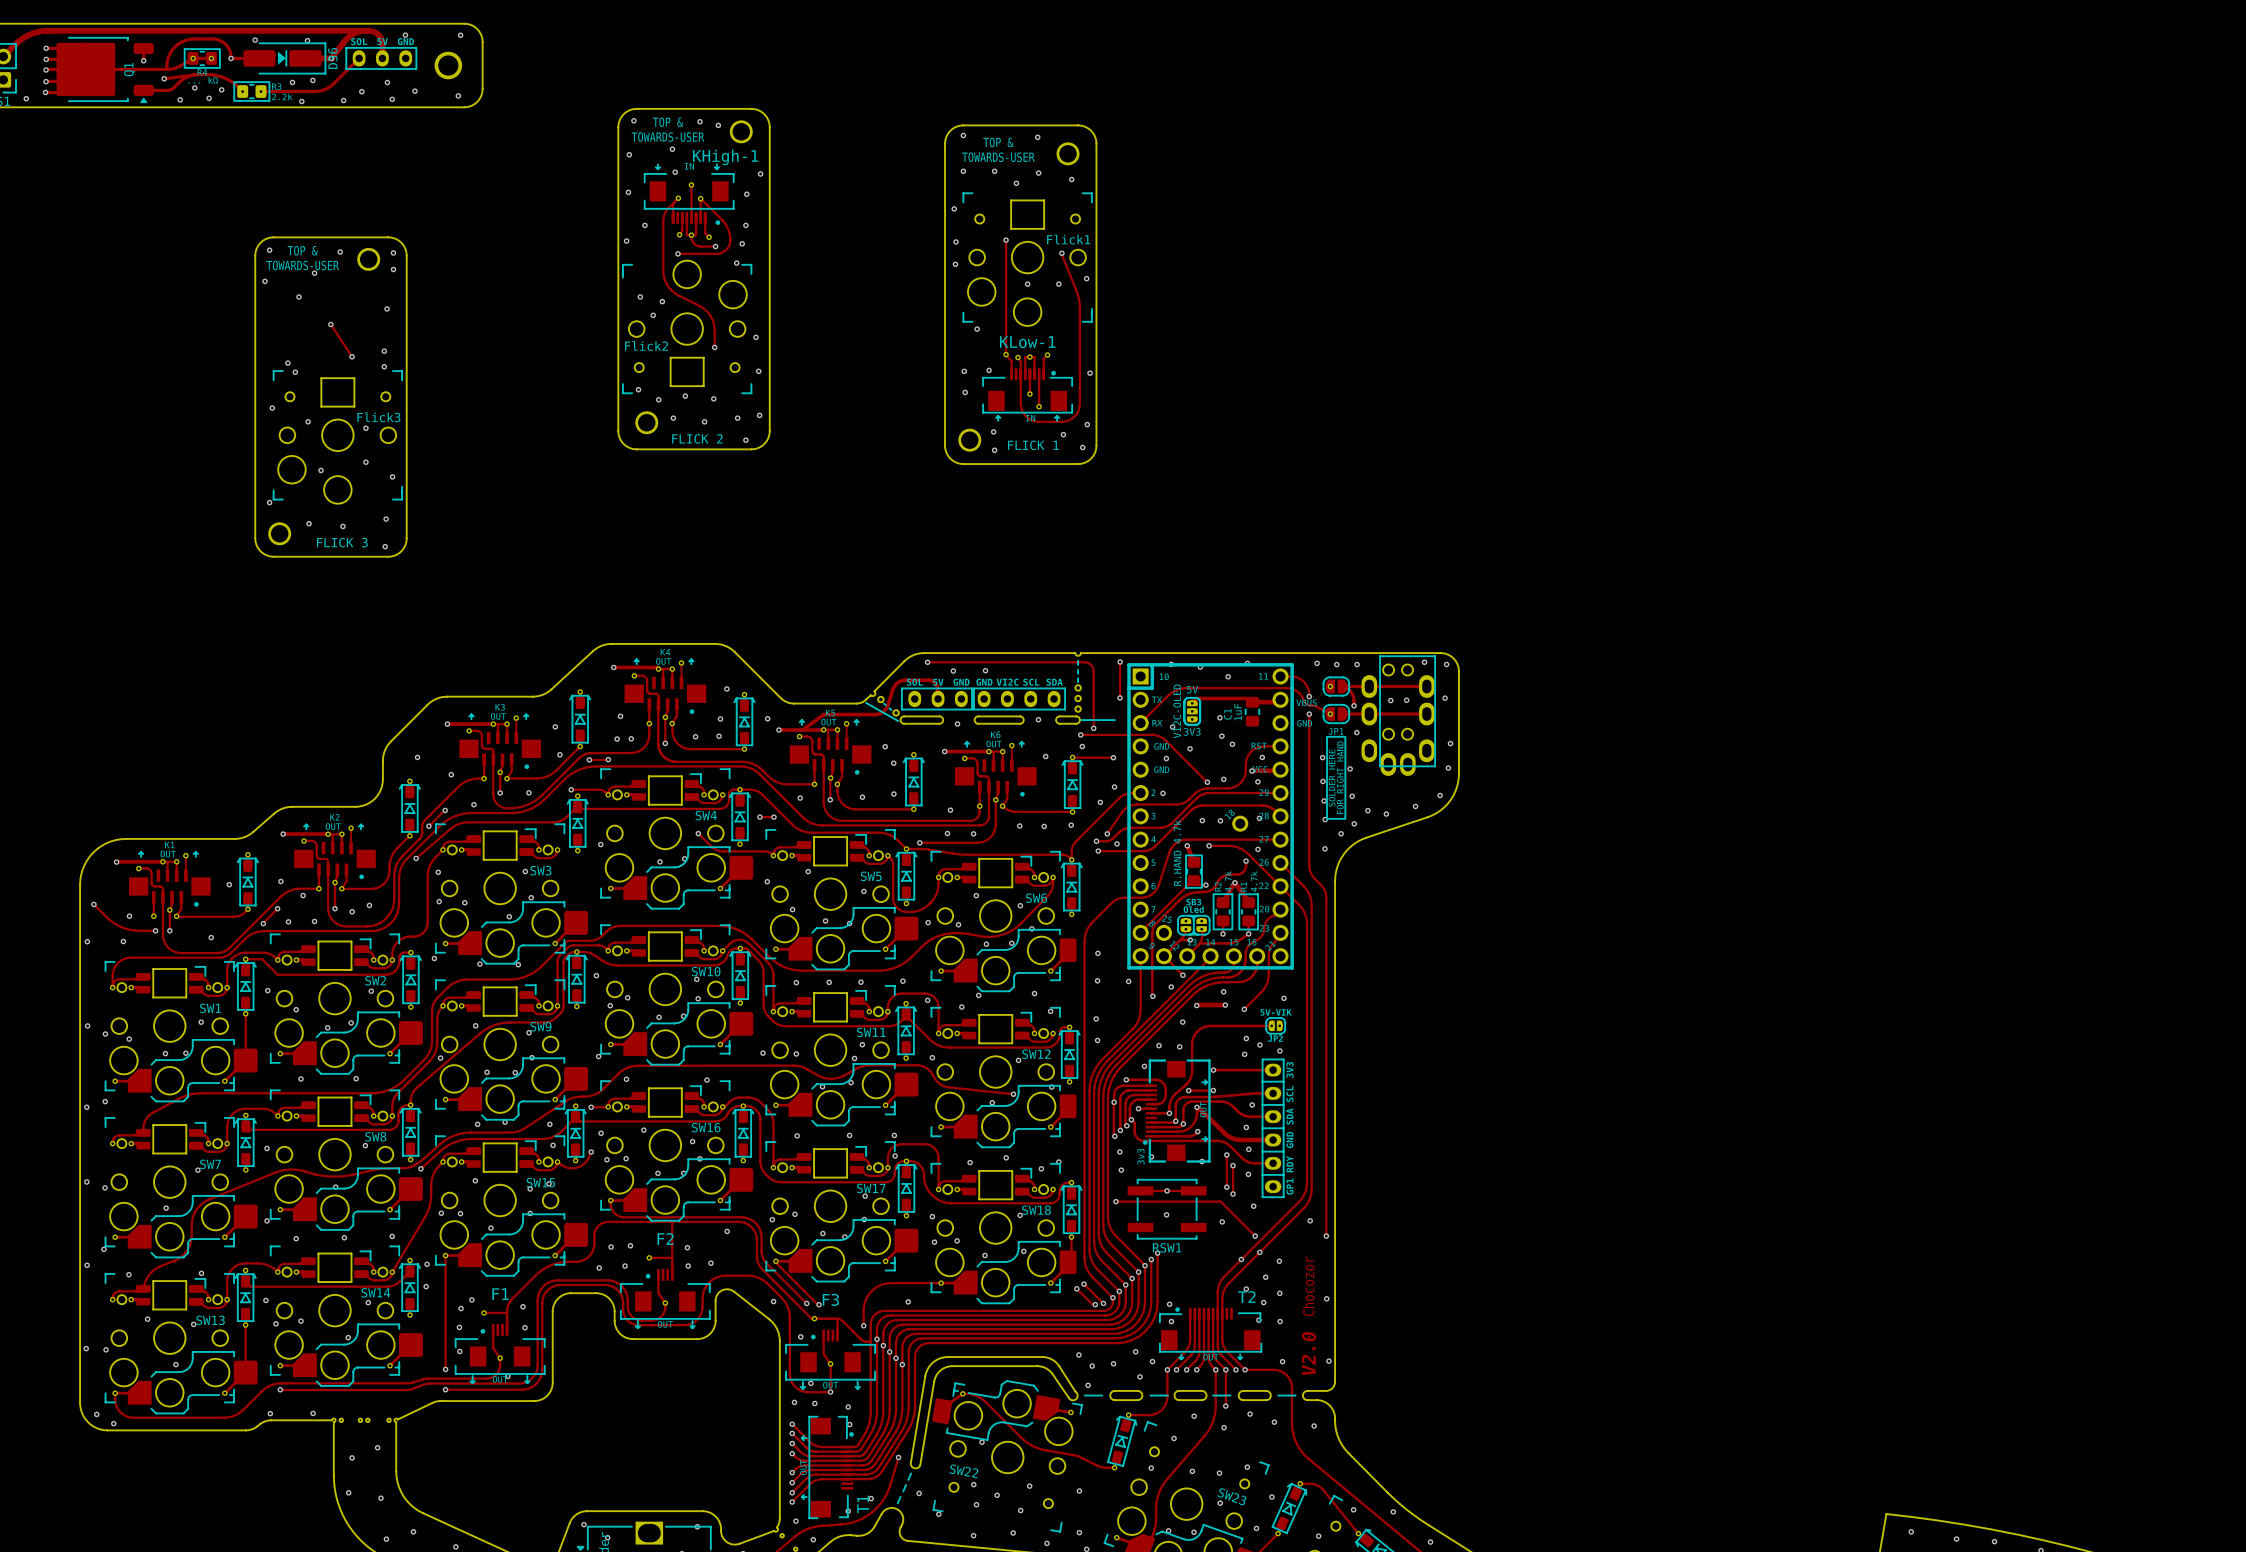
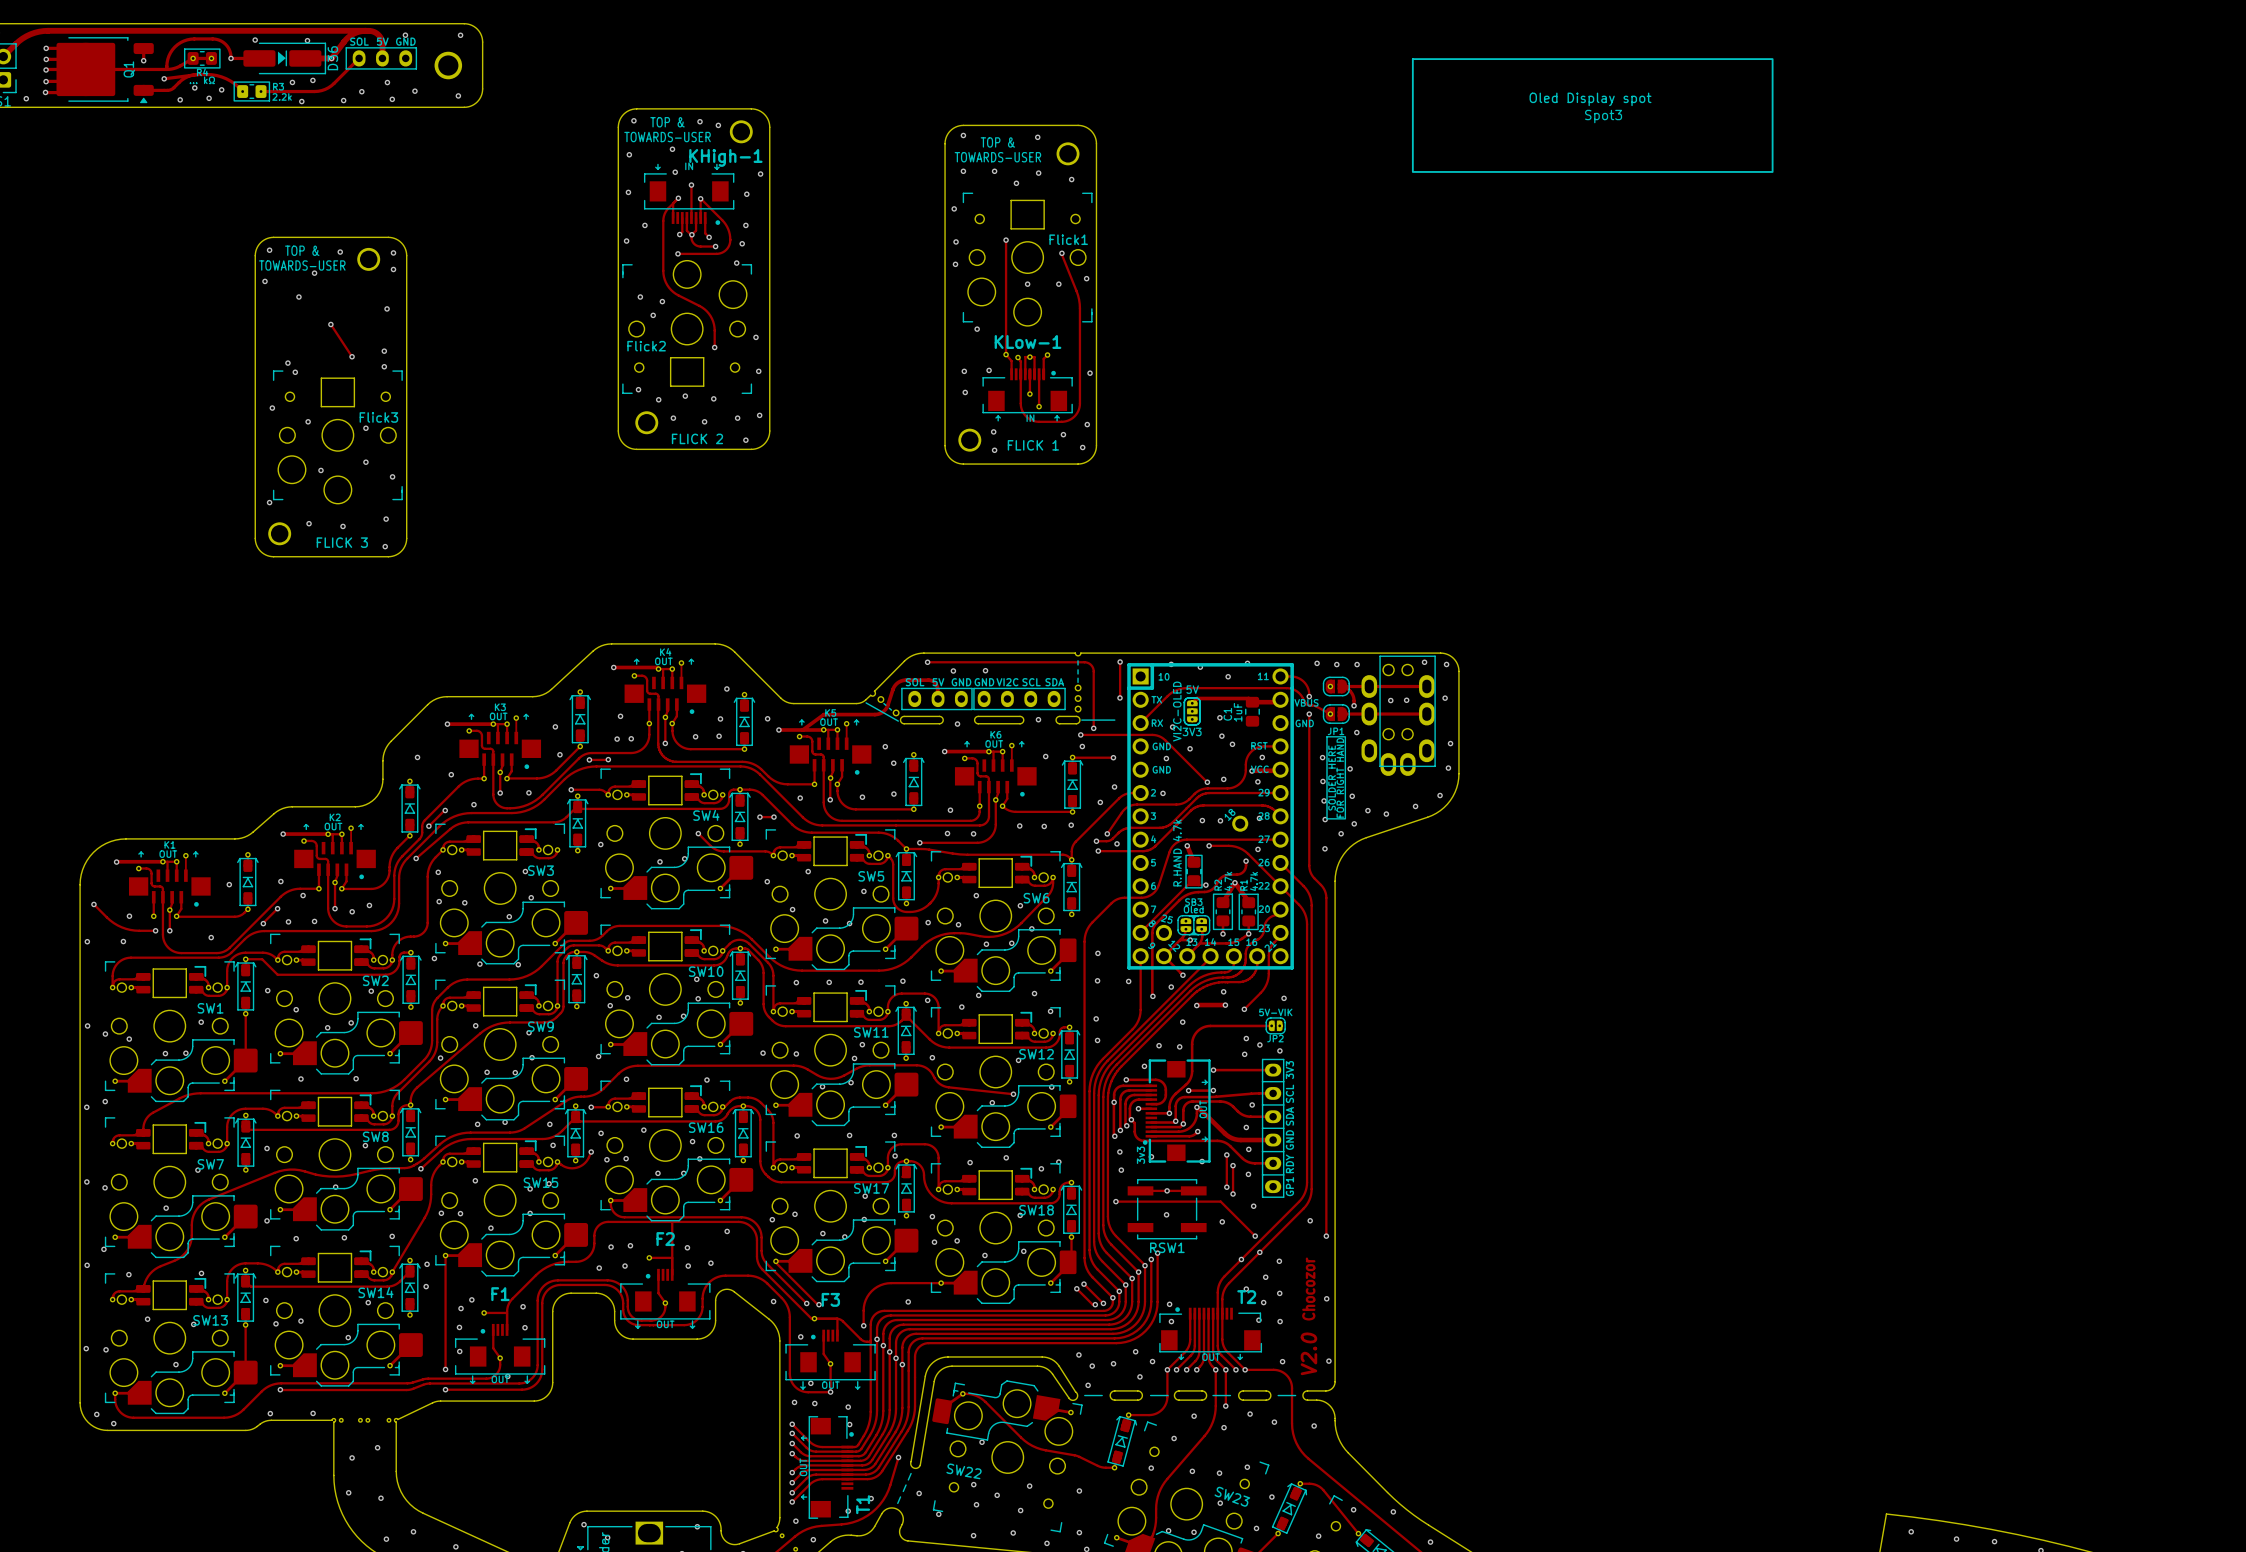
Spot3: none -> Oled Display spot (1592, 115)
KHigh-1 footprint: [644, 163, 735, 241] -> [644, 163, 735, 225]
track: none -> (691, 184) (691, 217)
via: none -> (691, 185)
via: none -> (678, 198)
track: none -> (700, 198) (700, 217)
via: none -> (700, 198)
track: none -> (673, 203) (673, 217)
track: none -> (682, 217) (682, 231) (679, 234)
track: none -> (686, 217) (686, 230) (691, 235) (696, 230) (696, 217)
track: none -> (705, 217) (705, 233) (709, 237)
via: none -> (679, 234)
via: none -> (691, 234)
via: none -> (709, 237)

